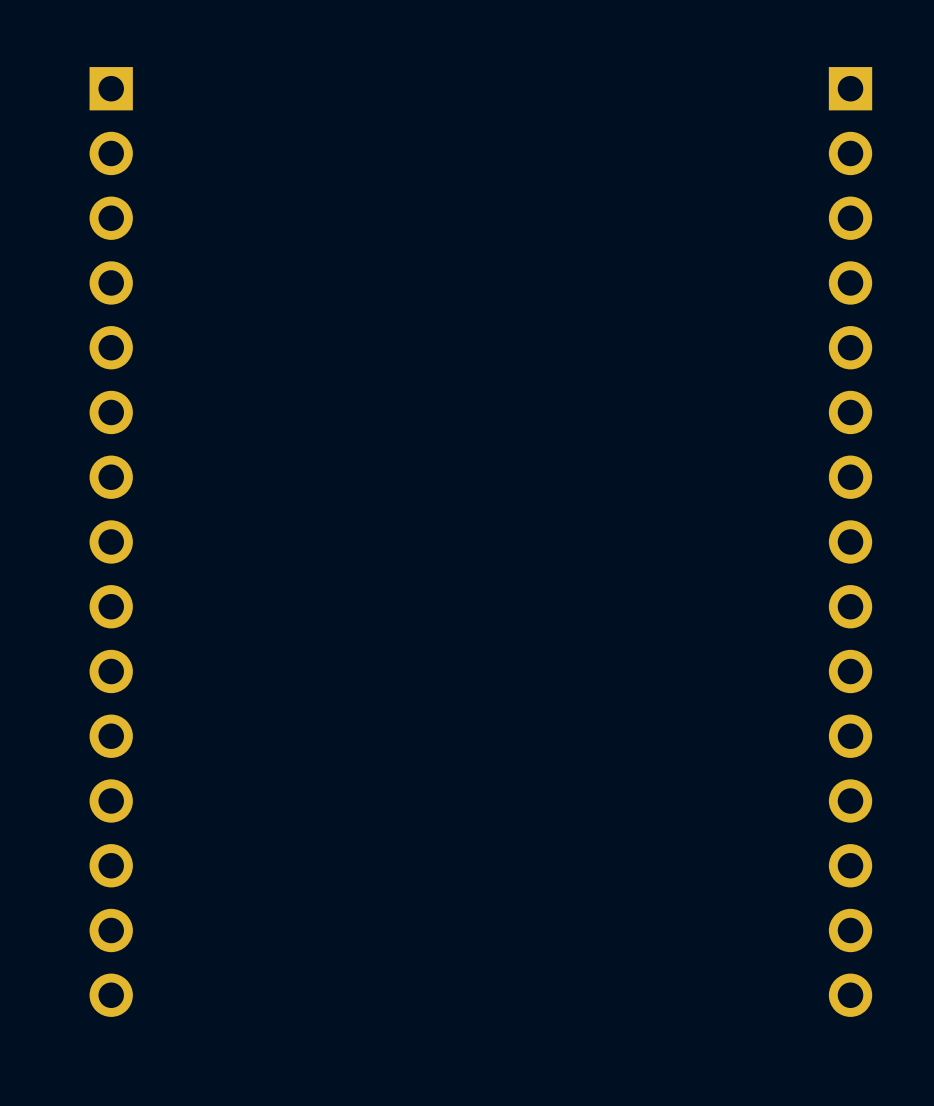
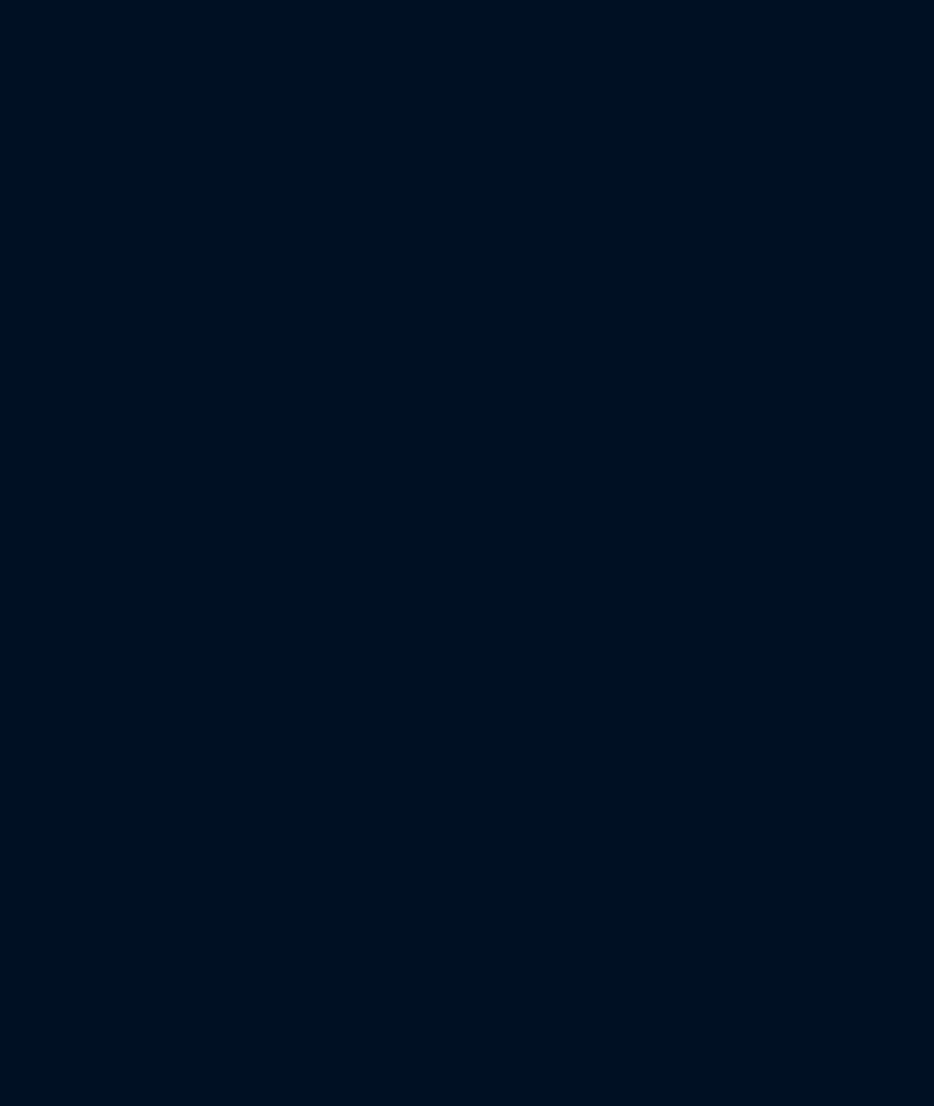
part: (111, 541) -> none
part: (850, 541) -> none

